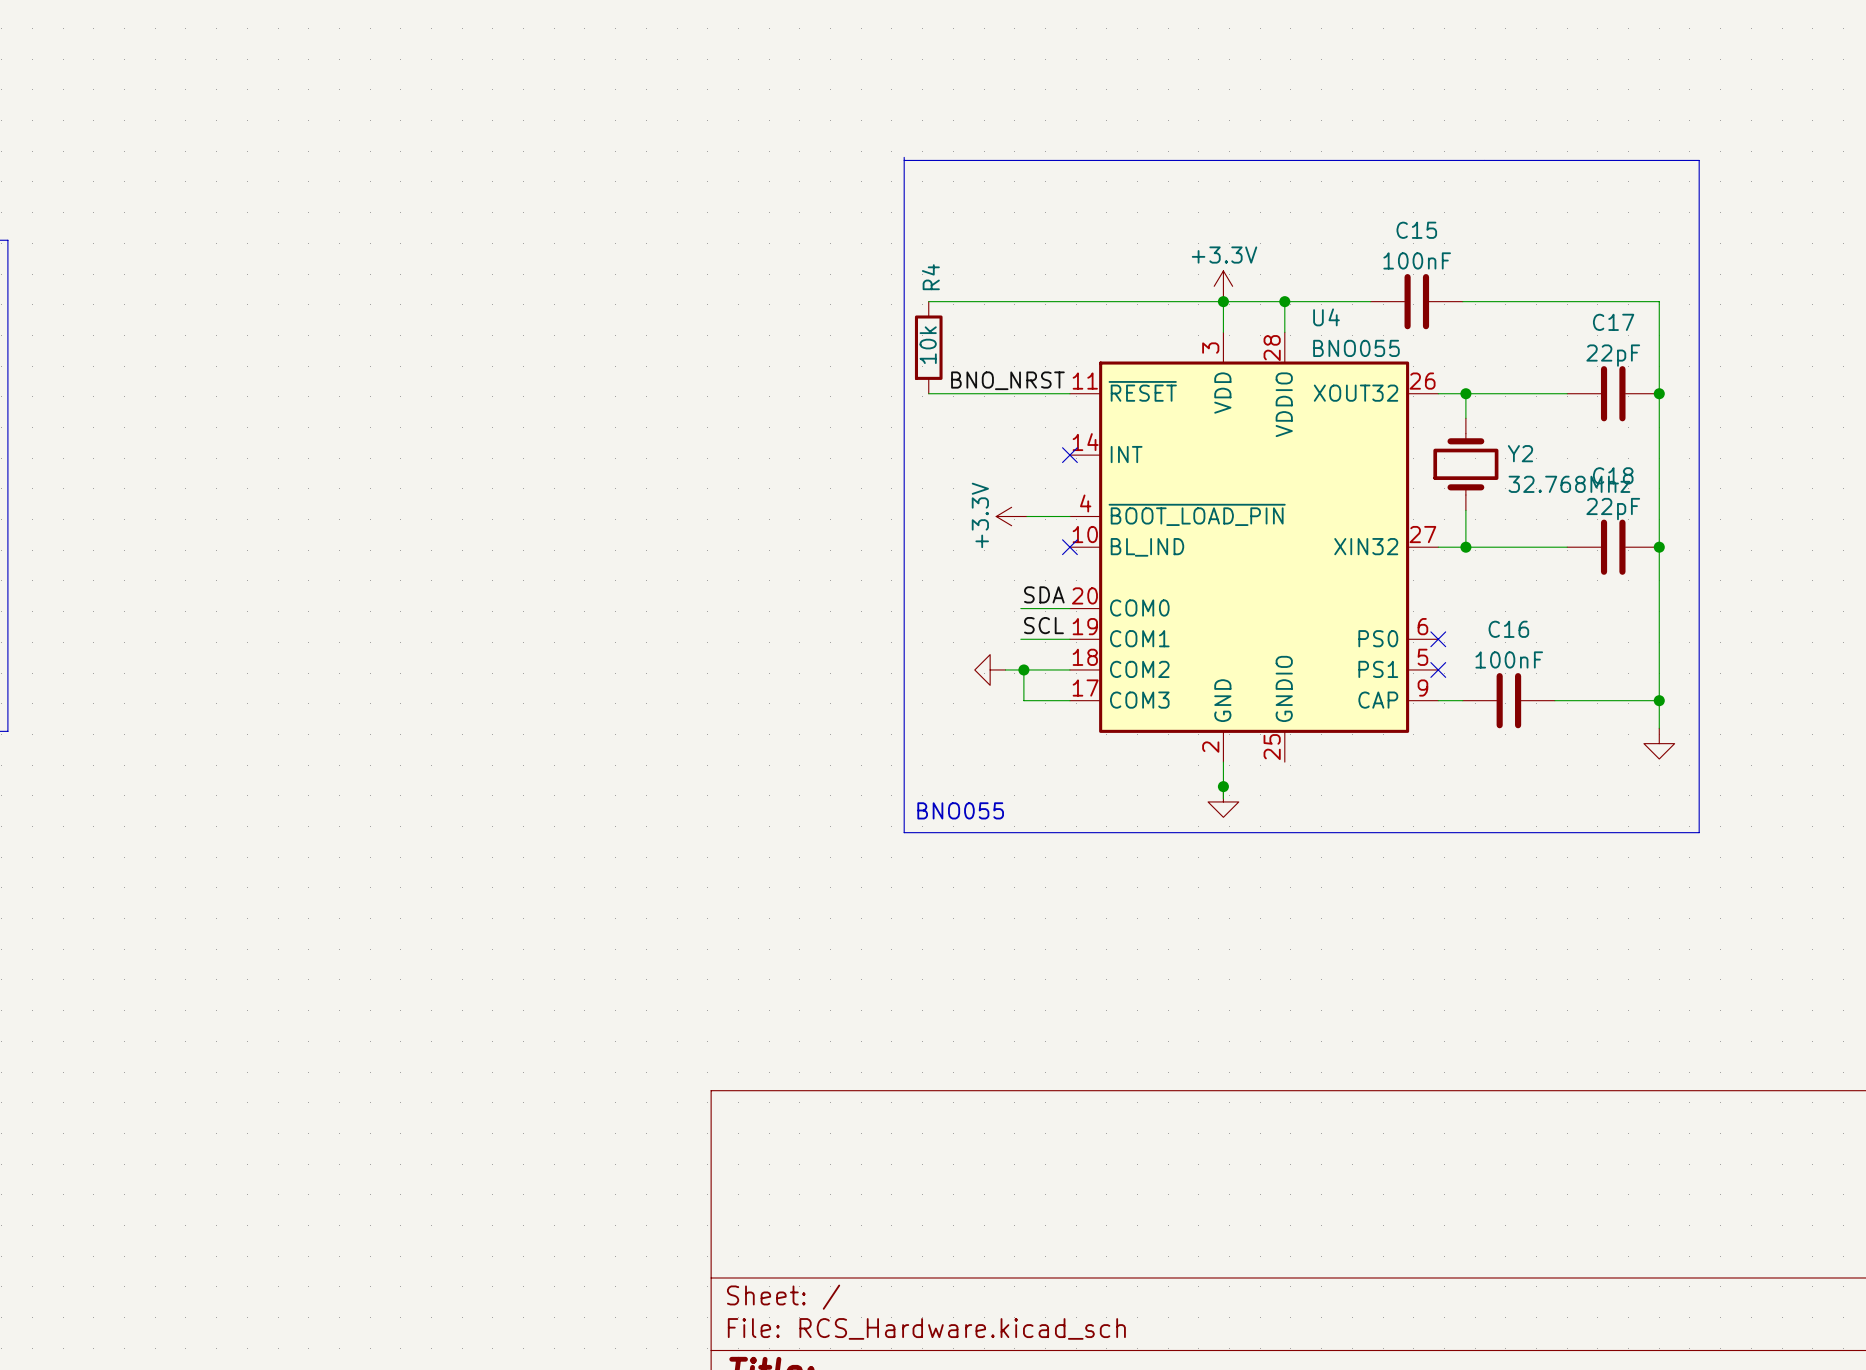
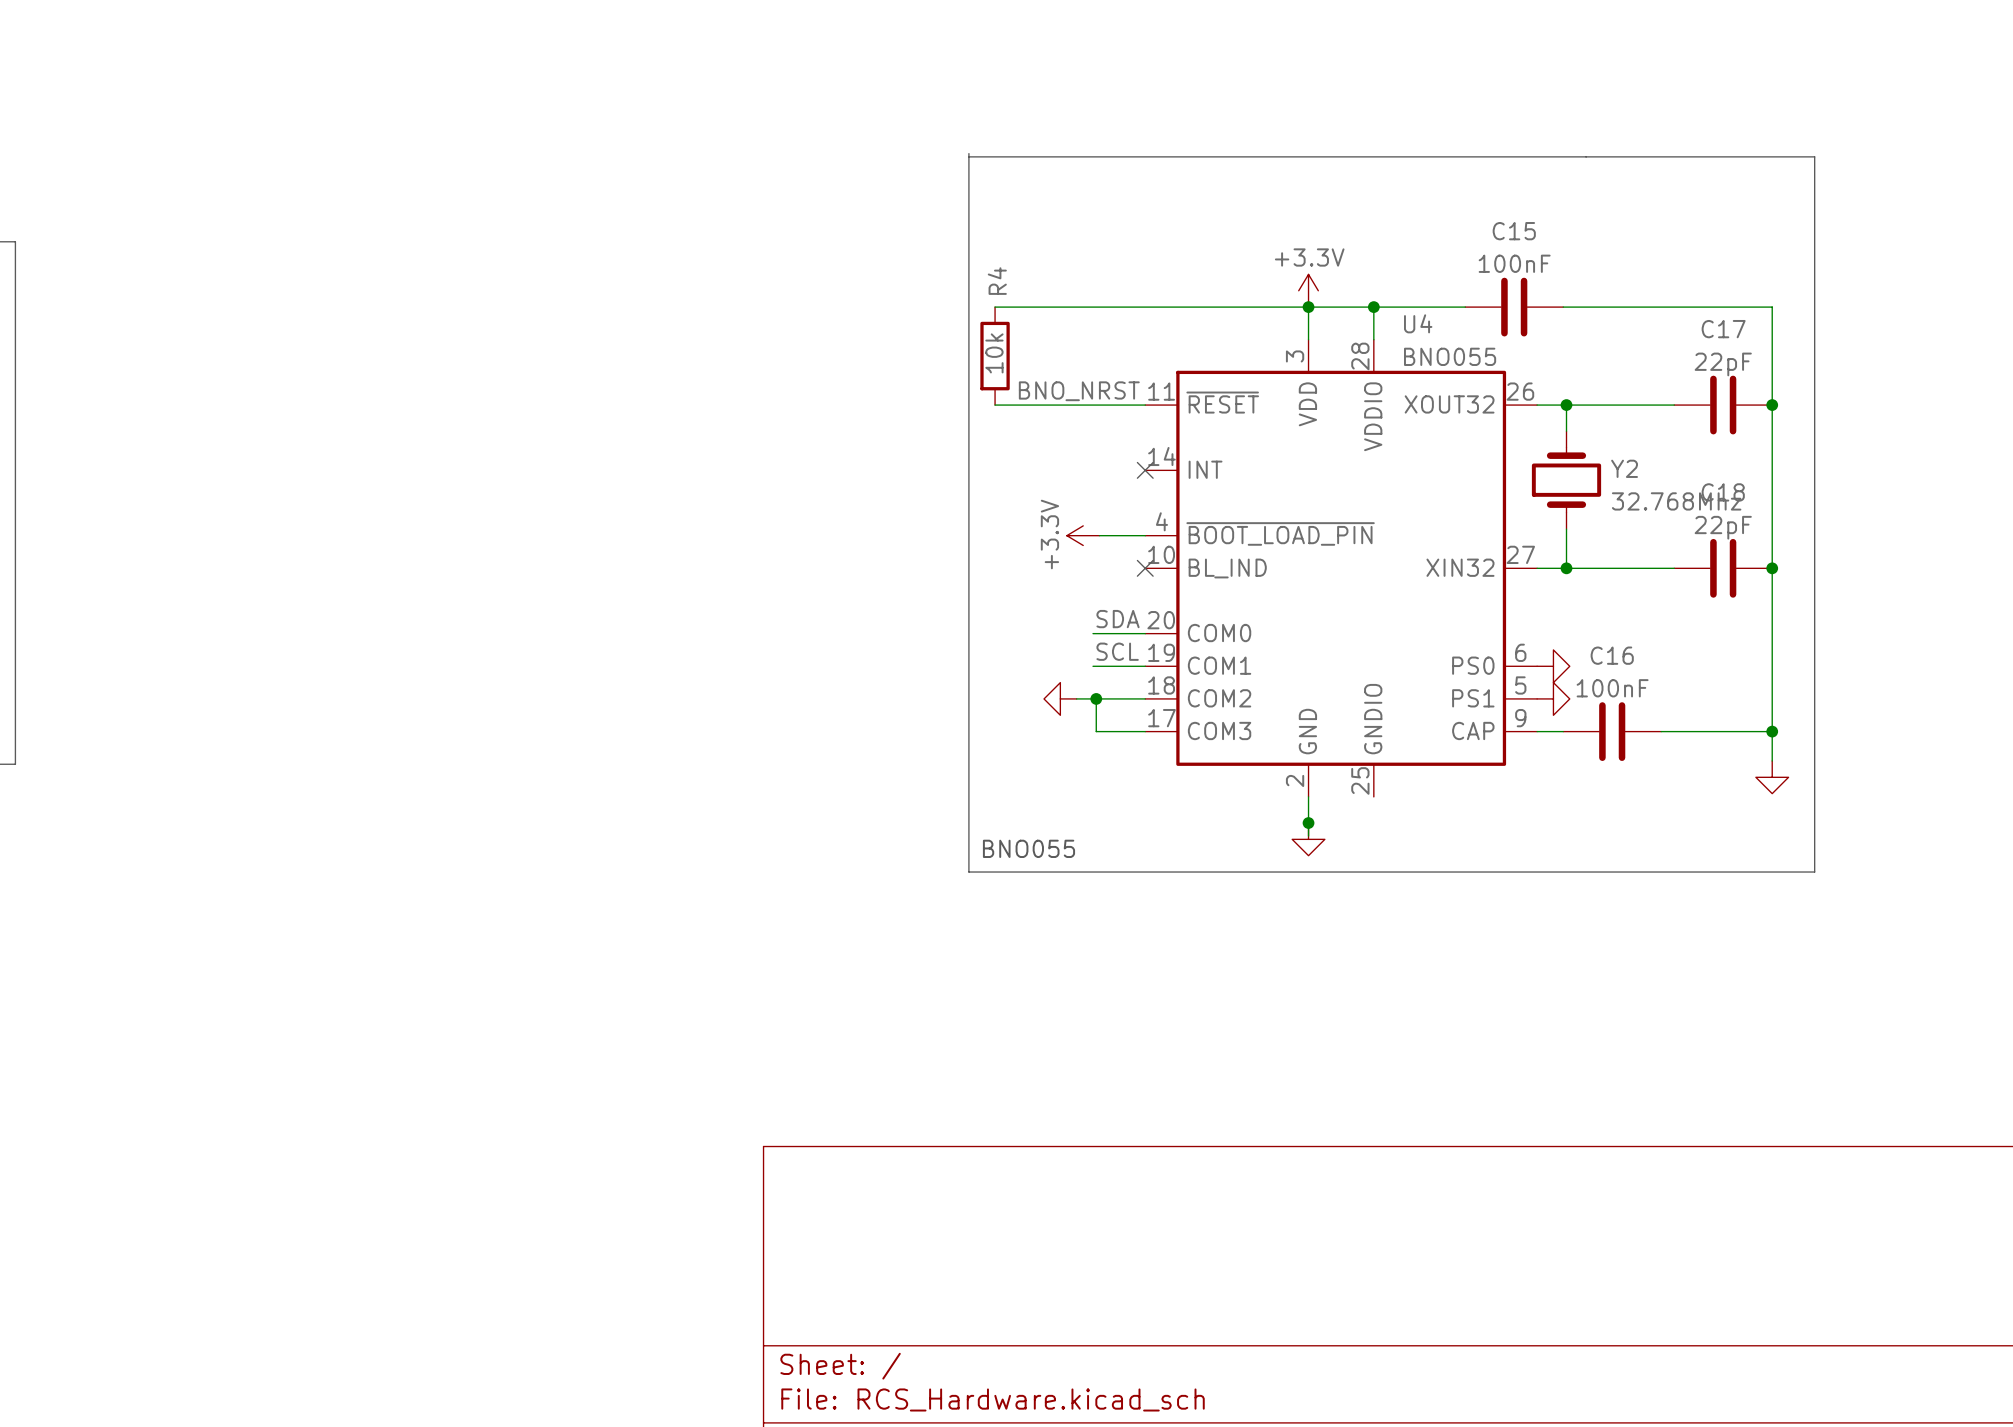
no-connect mark: (1438, 639) -> none
power symbol: none -> (1553, 666)
no-connect mark: (1438, 669) -> none
power symbol: none -> (1553, 698)

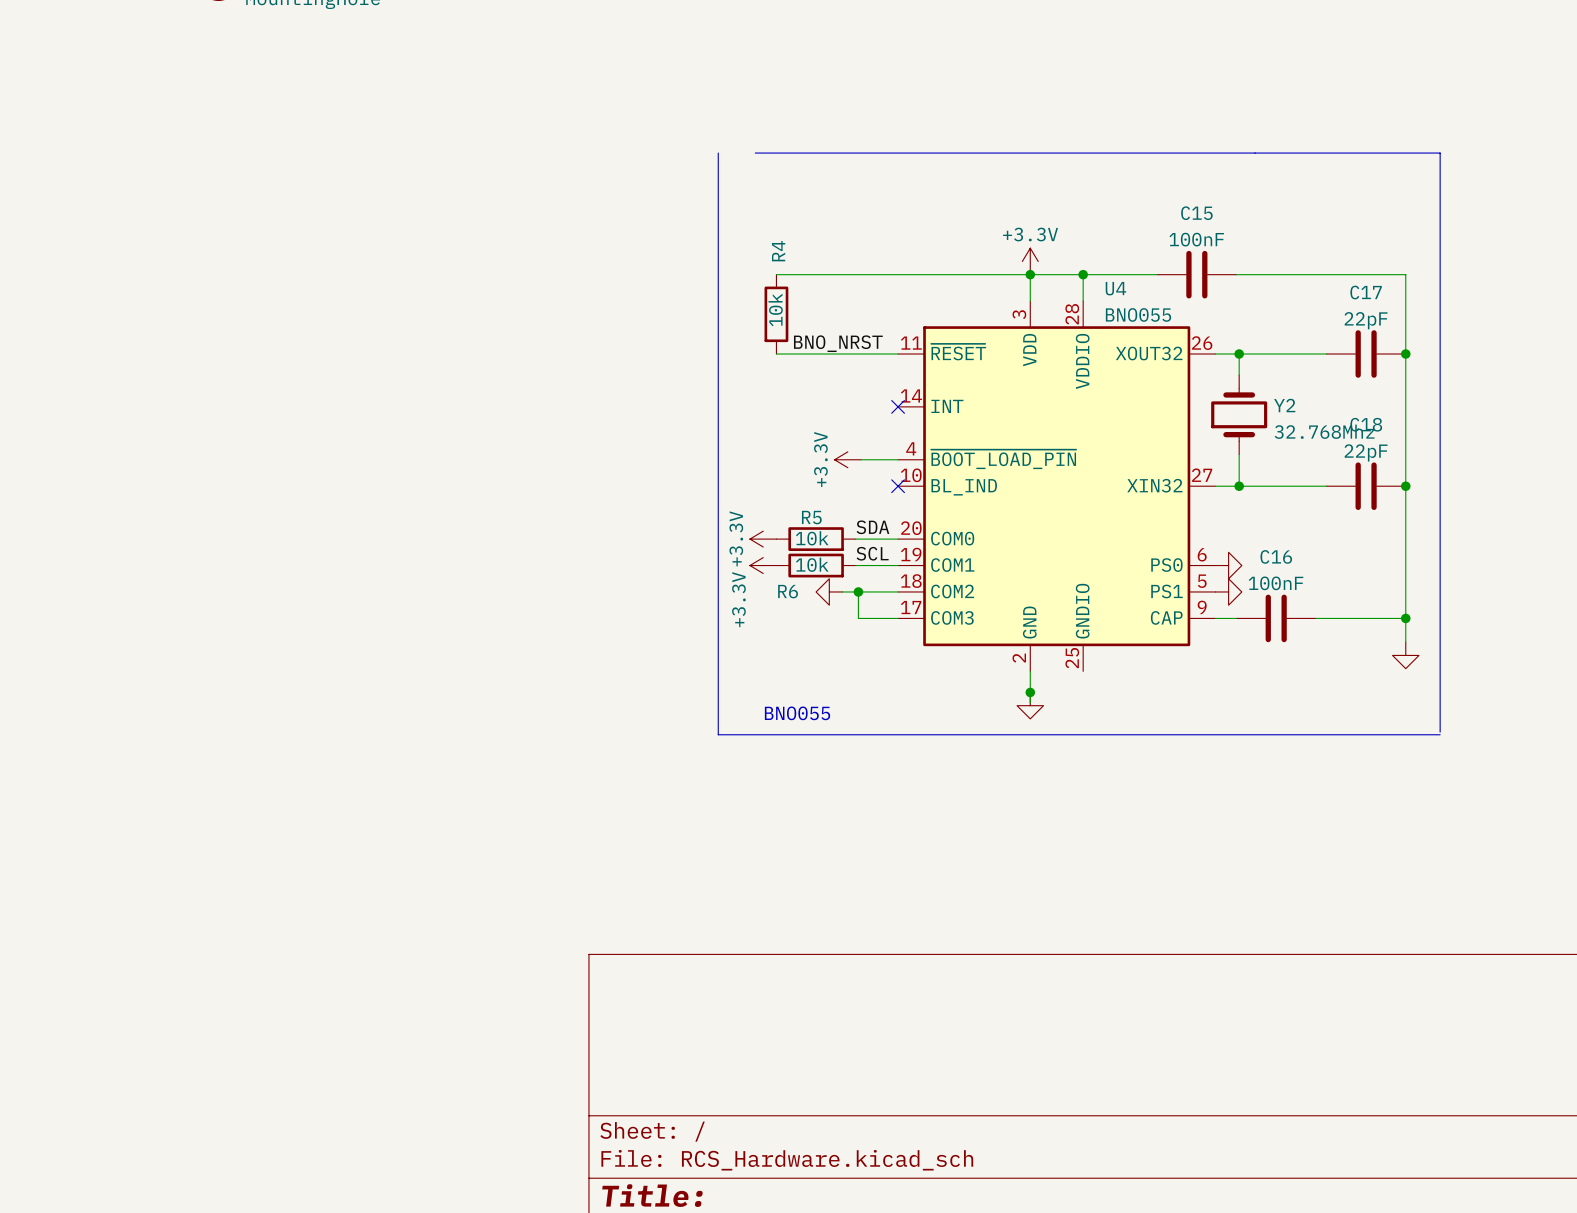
line: (968, 153) (968, 872) (1814, 872) -> none
line: none -> (718, 153) (718, 734) (1440, 734)
power symbol: none -> +3.3V (763, 539)
R5: none -> 10k (816, 539)
power symbol: none -> +3.3V (763, 565)
R6: none -> 10k (816, 565)

